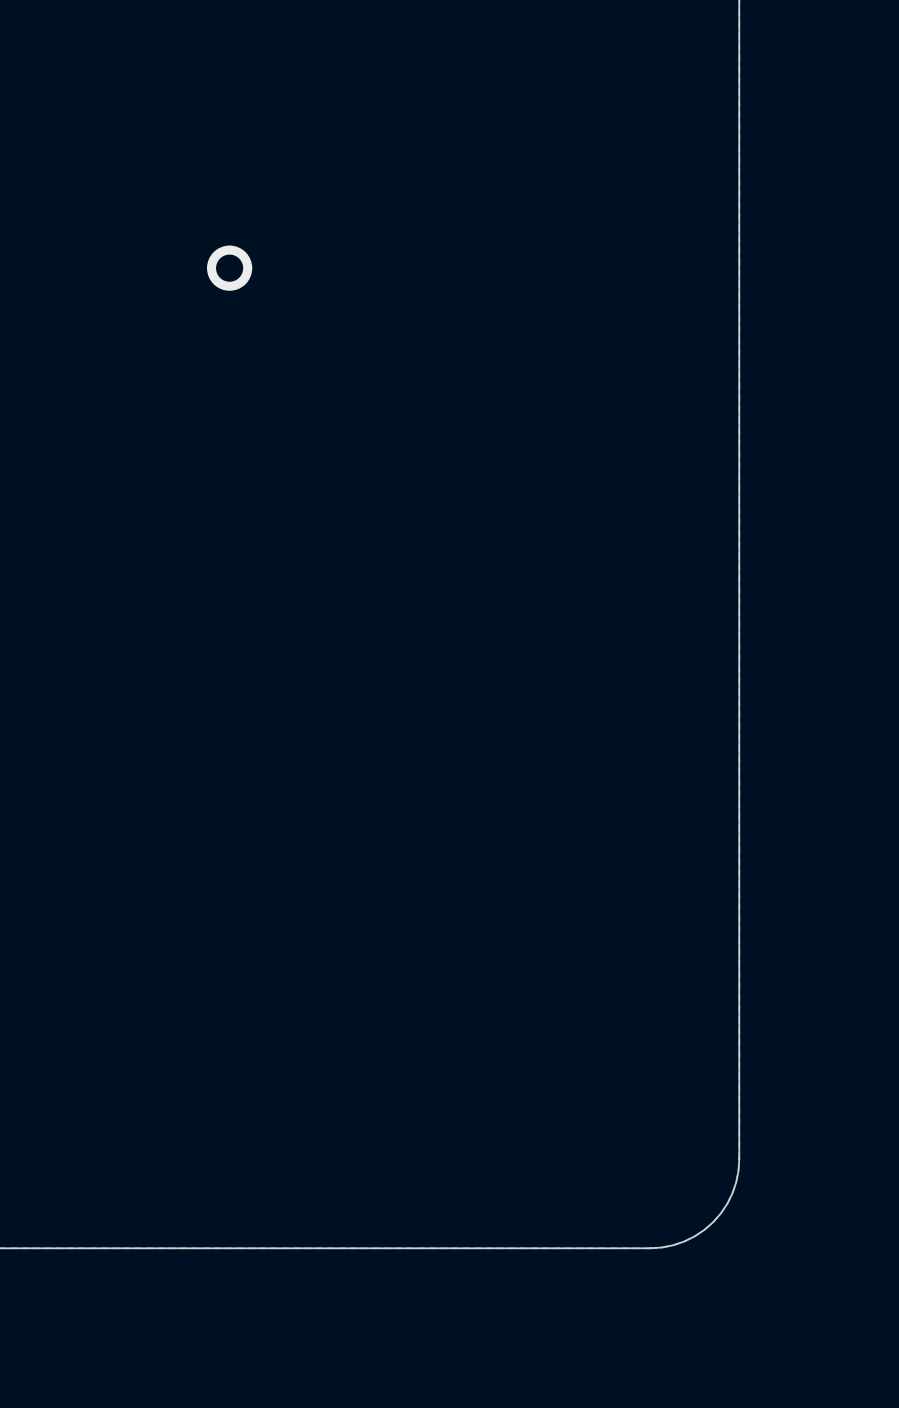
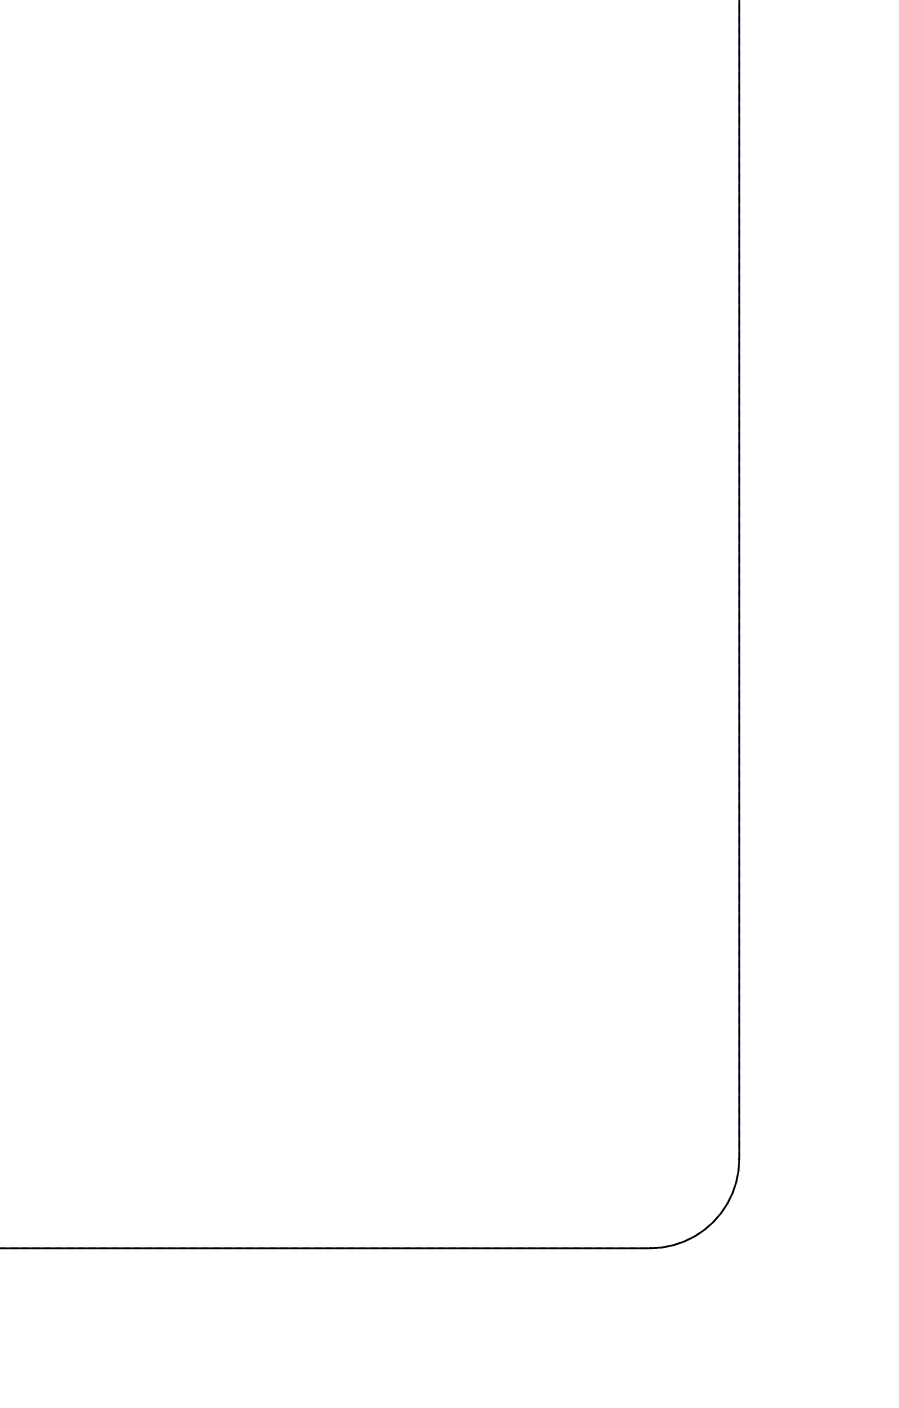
via: (229, 268) -> none

